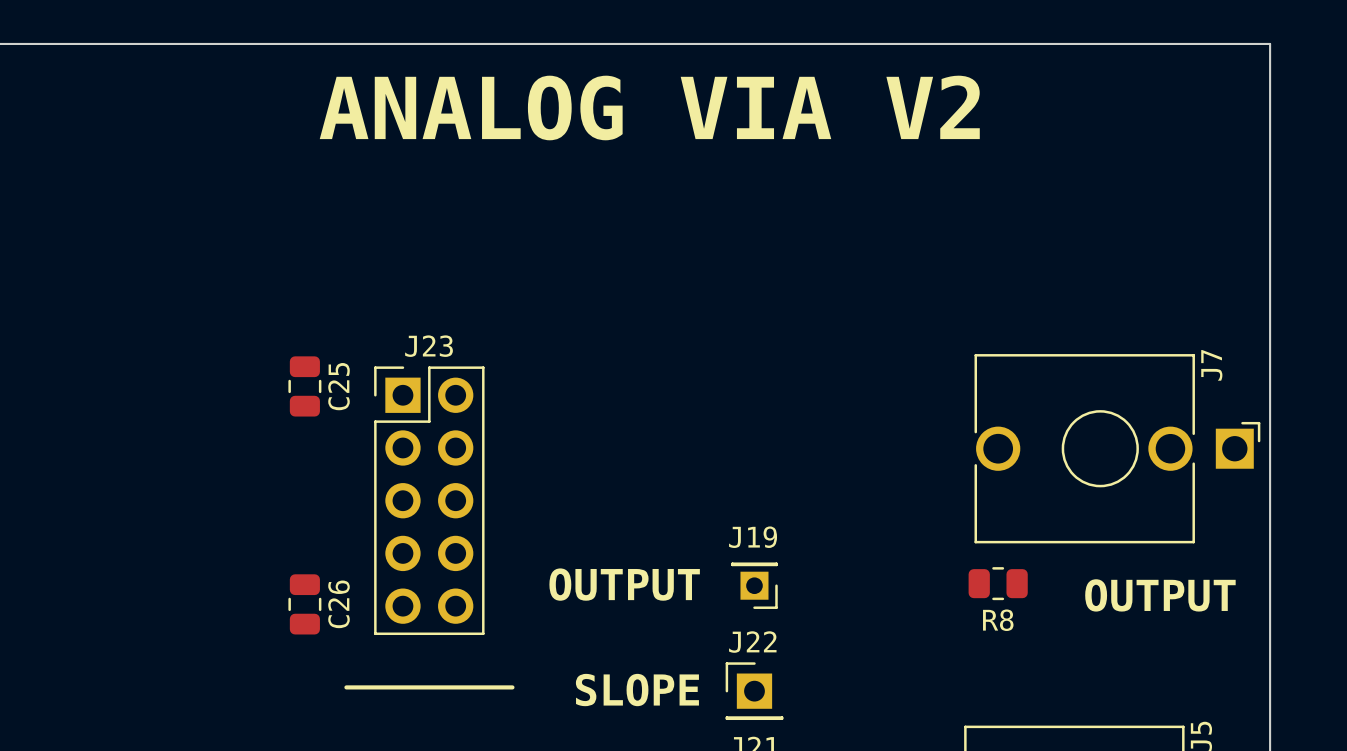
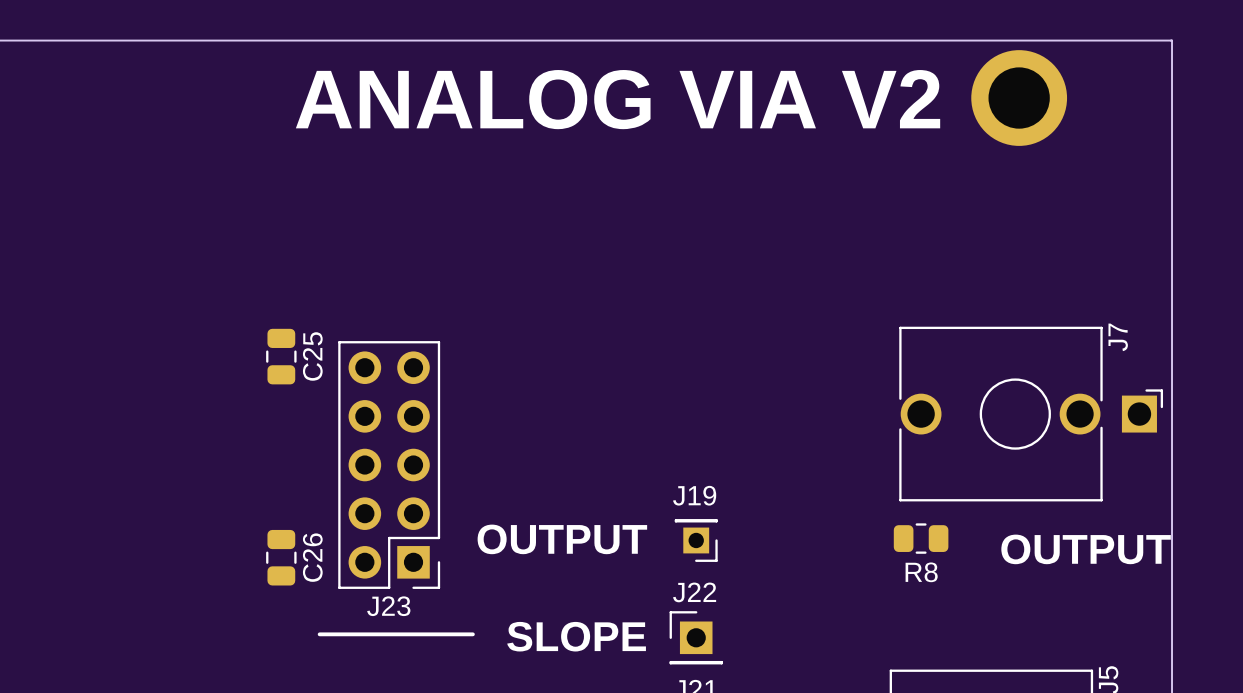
part: none -> (1019, 98)
J23 rotation: 0° (429, 500) -> 180° (389, 465)

